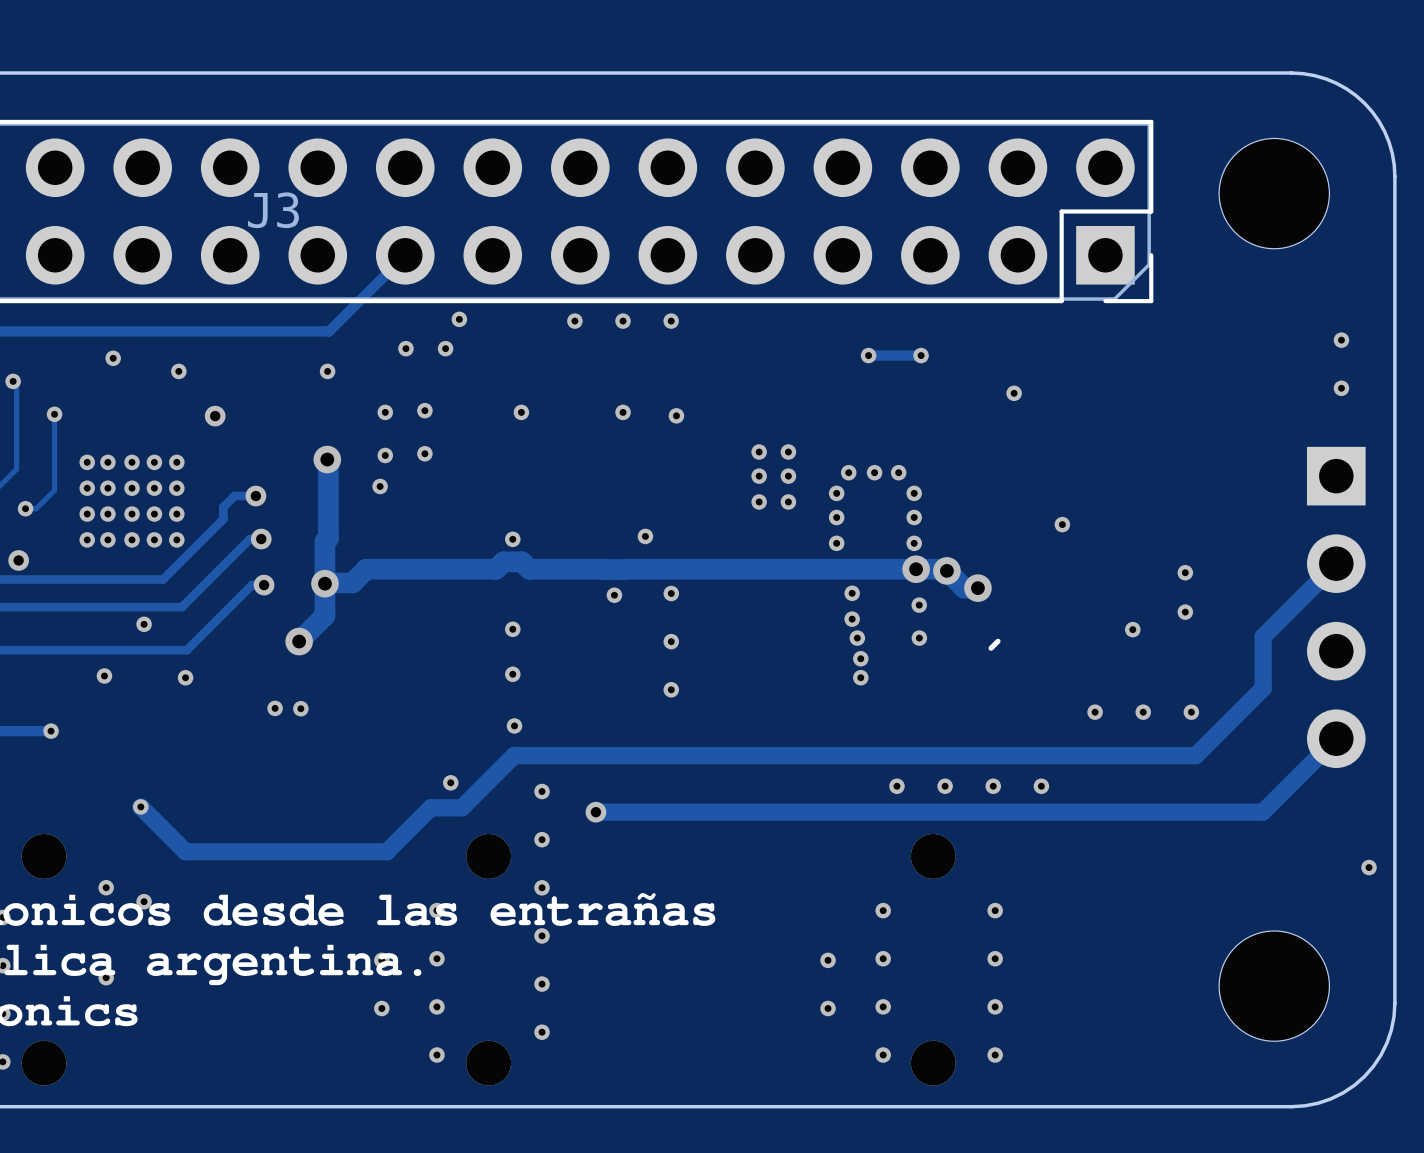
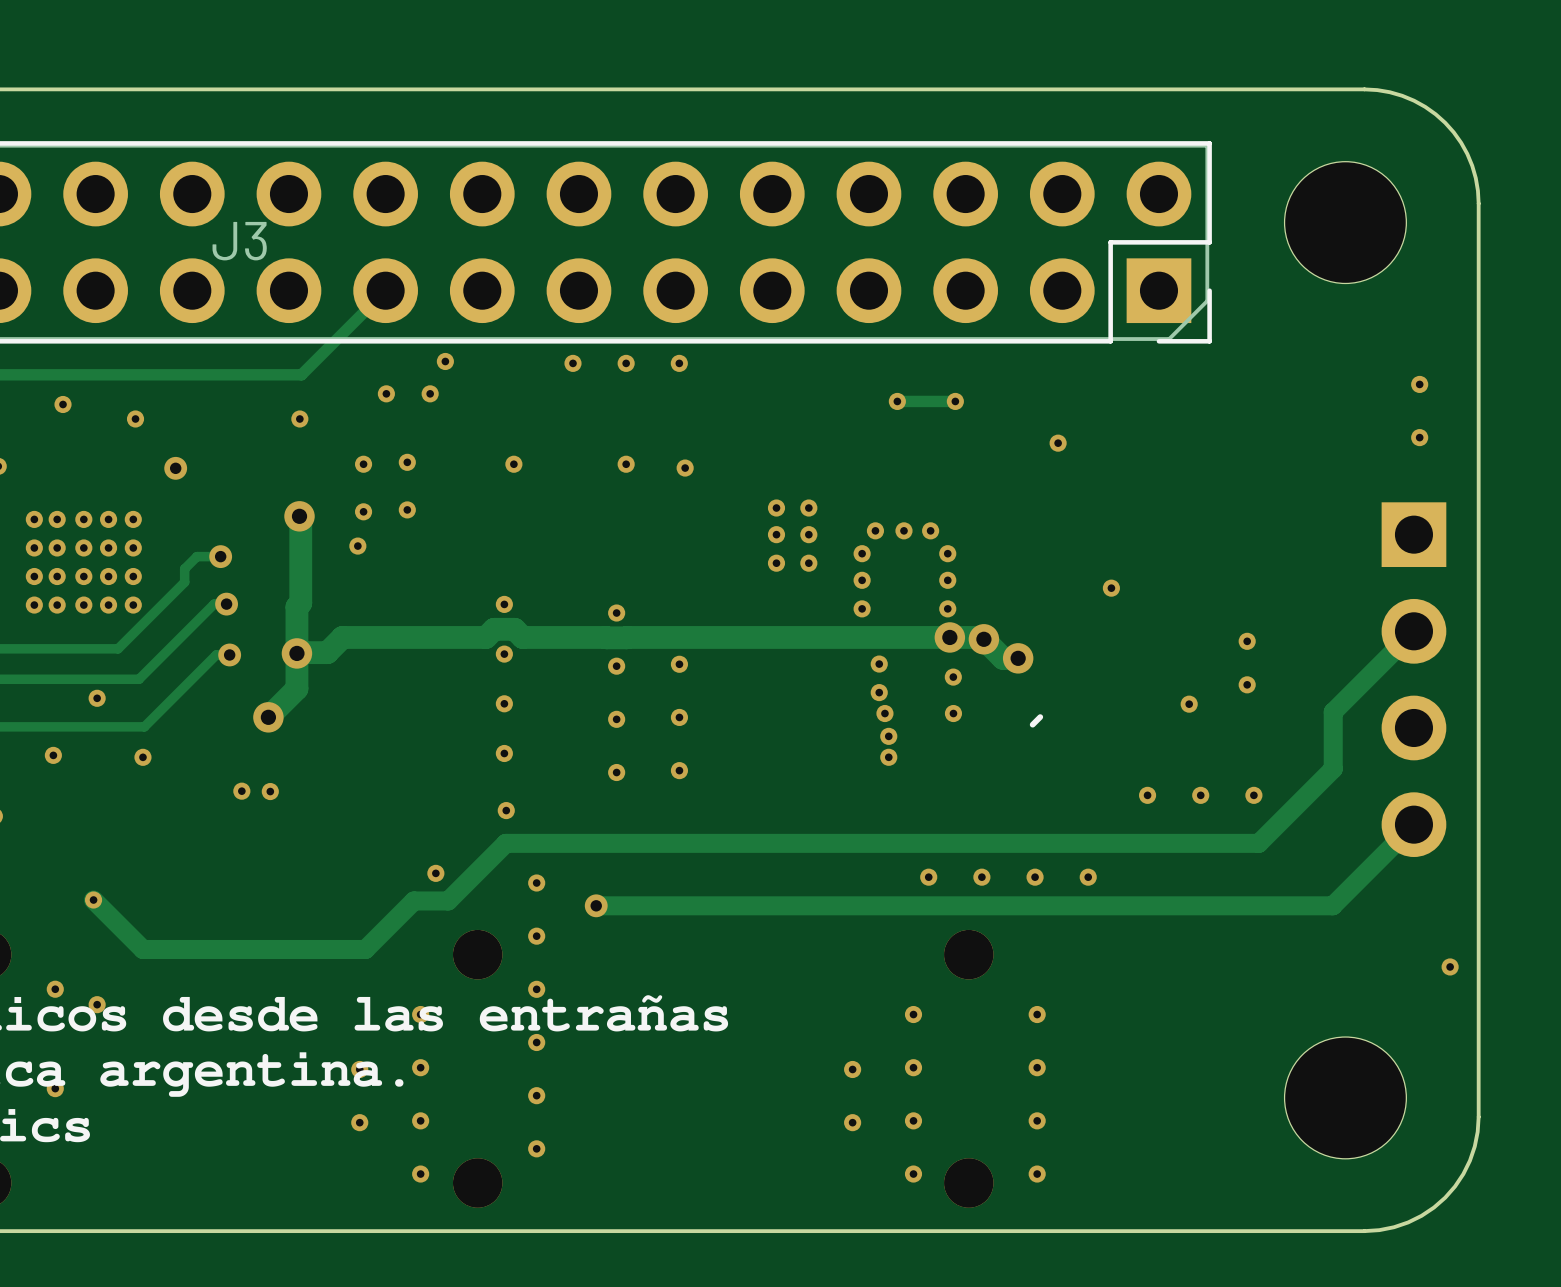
via position: (645, 536) -> (616, 613)
via: none -> (504, 654)
via: none -> (616, 719)
via: none -> (616, 772)

